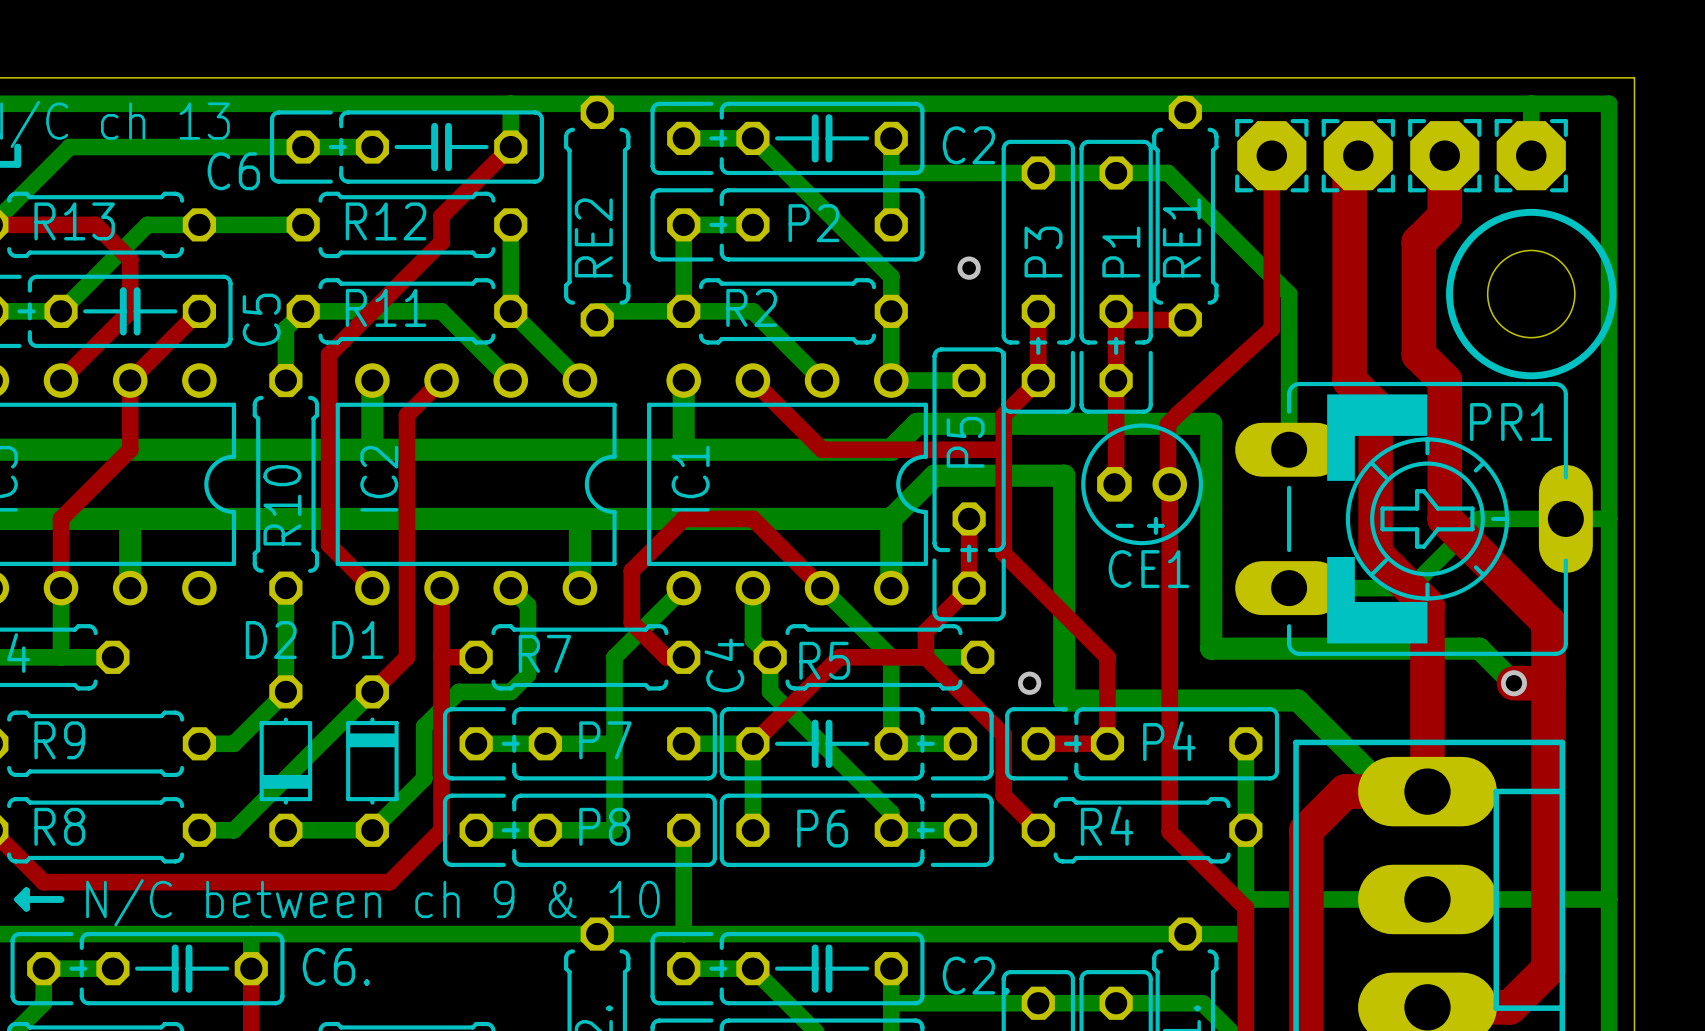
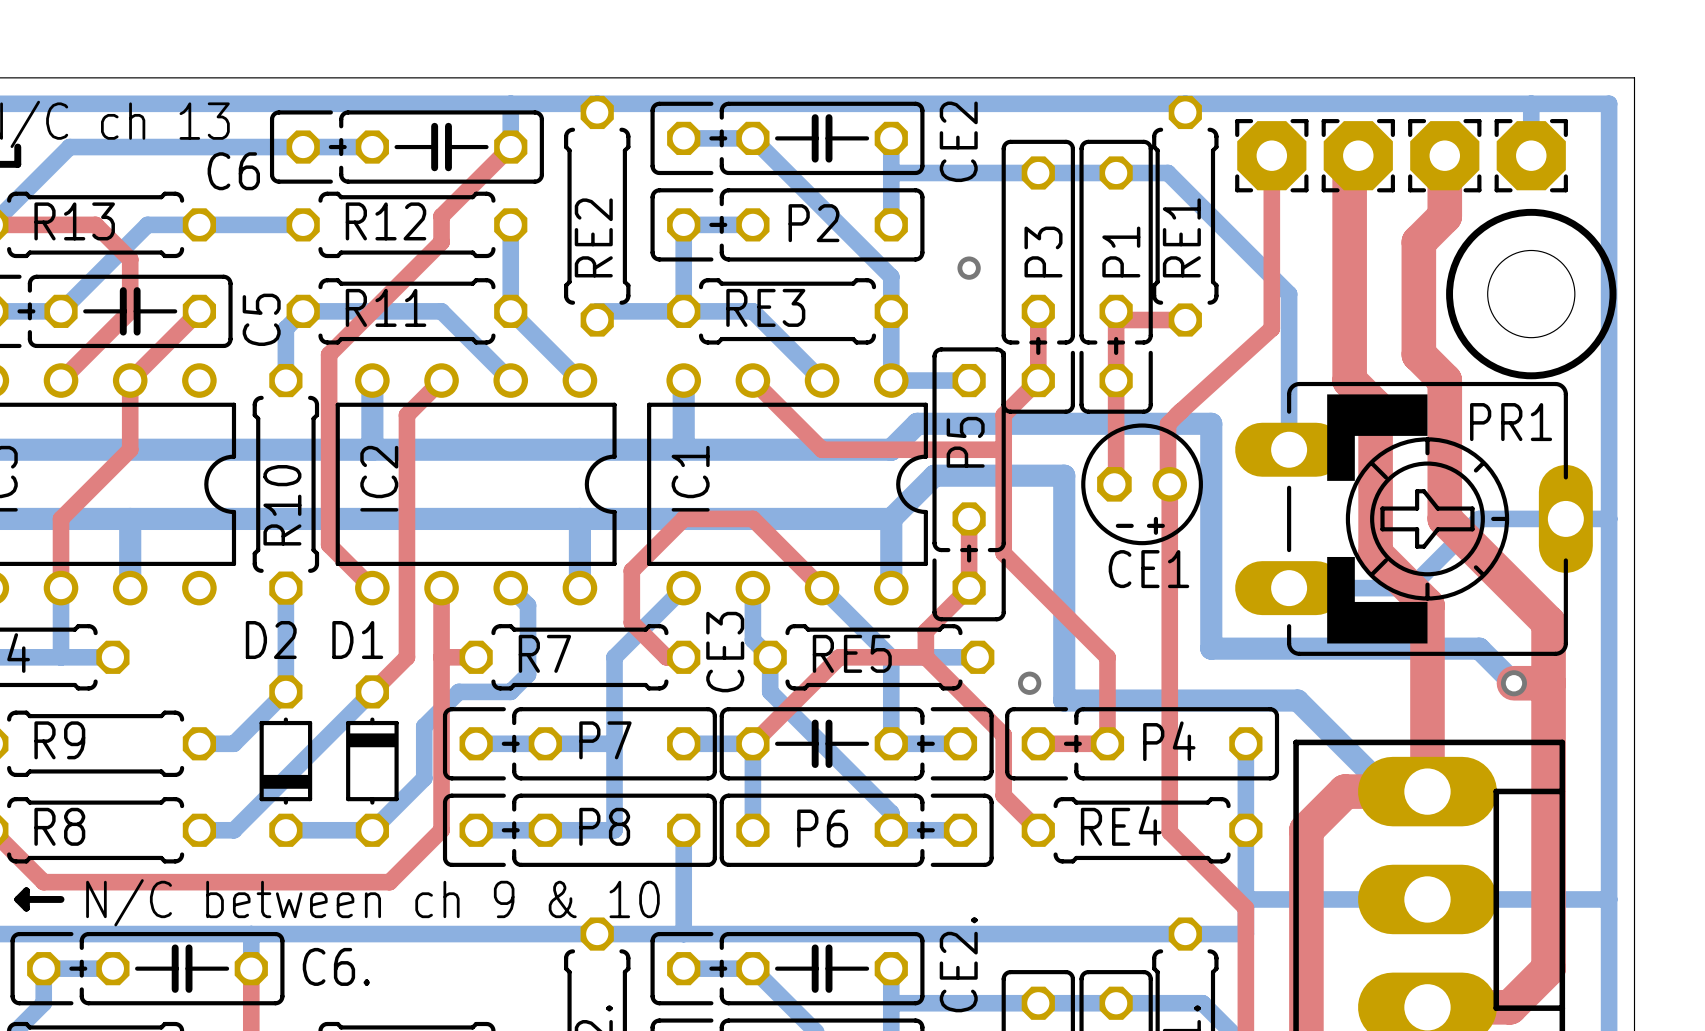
C2 name: C2 (968, 145) -> CE2 (958, 141)
R2 name: R2 (751, 307) -> RE3 (765, 307)
R5 name: R5 (824, 660) -> RE5 (852, 653)
C4 name: C4 (724, 665) -> CE3 (725, 652)
R4 name: R4 (1107, 825) -> RE4 (1121, 825)
C2. name: C2. (976, 975) -> CE2. (958, 964)

